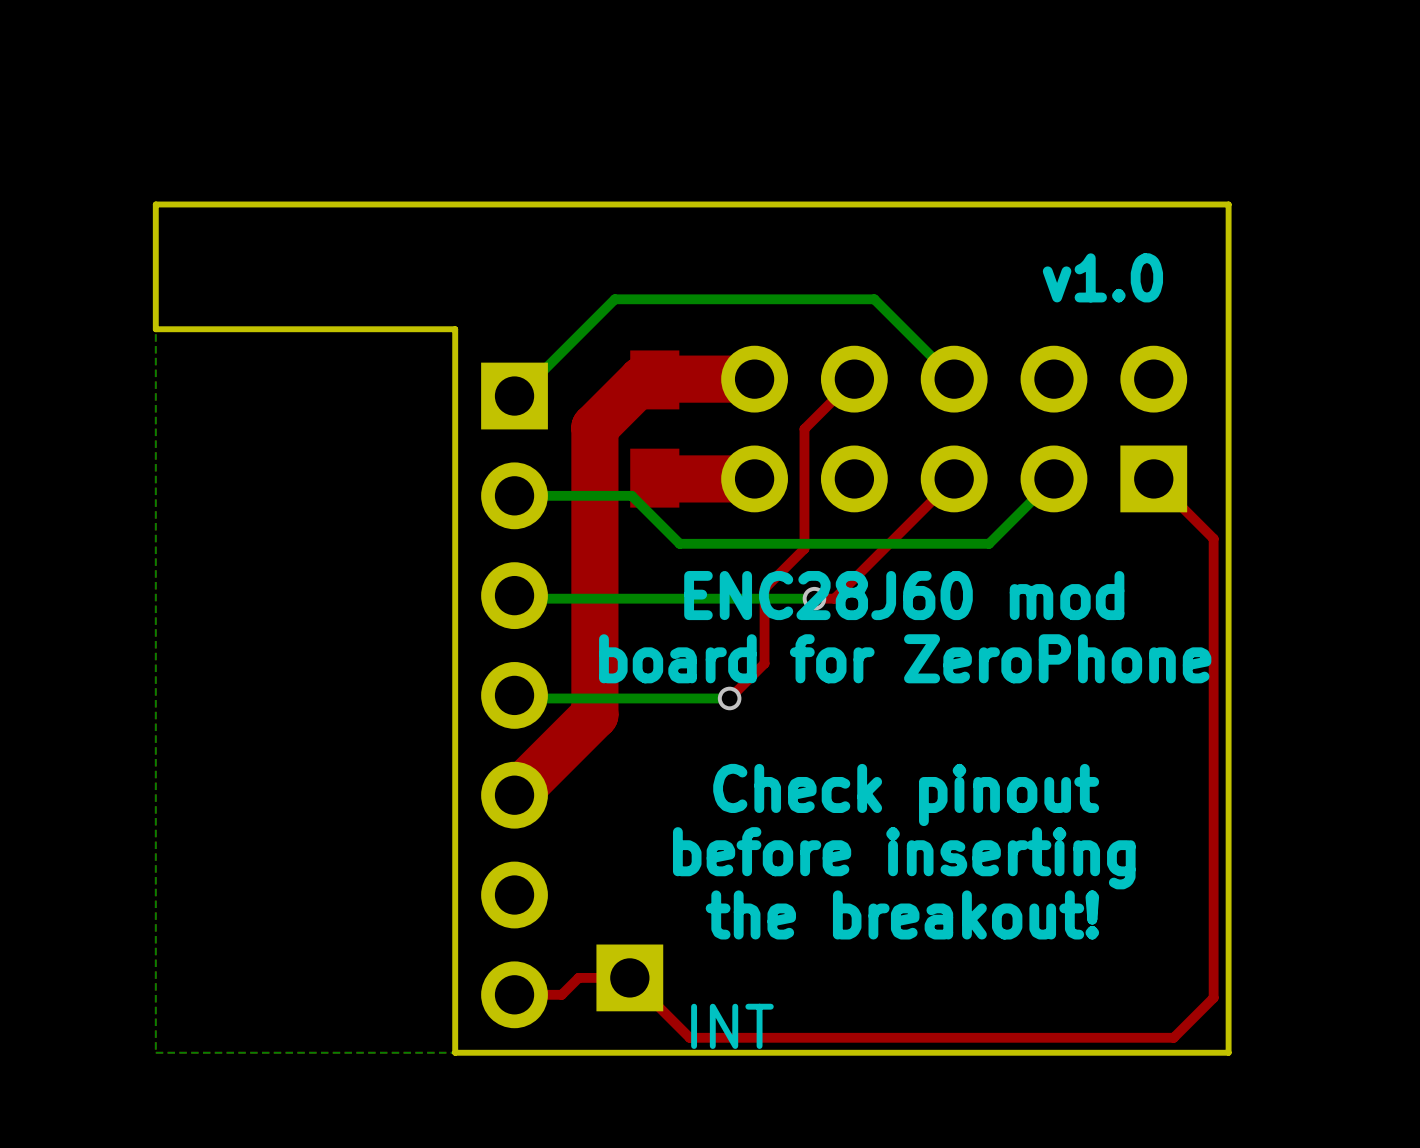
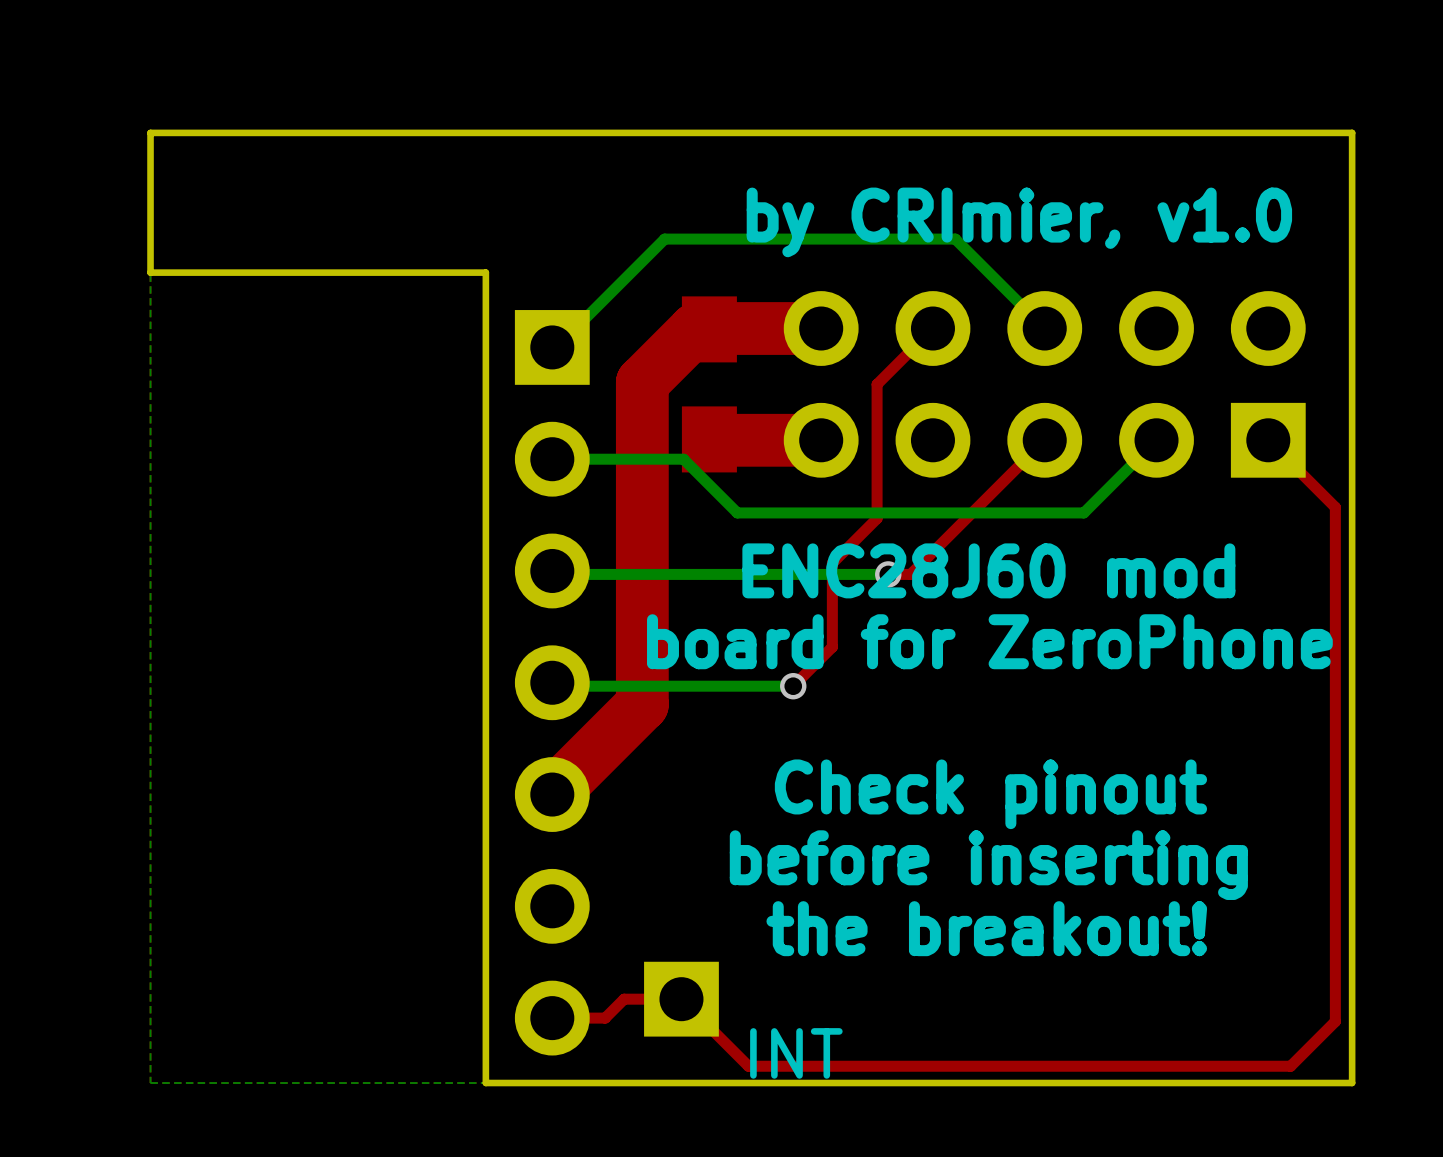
text: v1.0 (1102, 277) -> none
text: none -> by CRImier, v1.0 (1019, 222)

